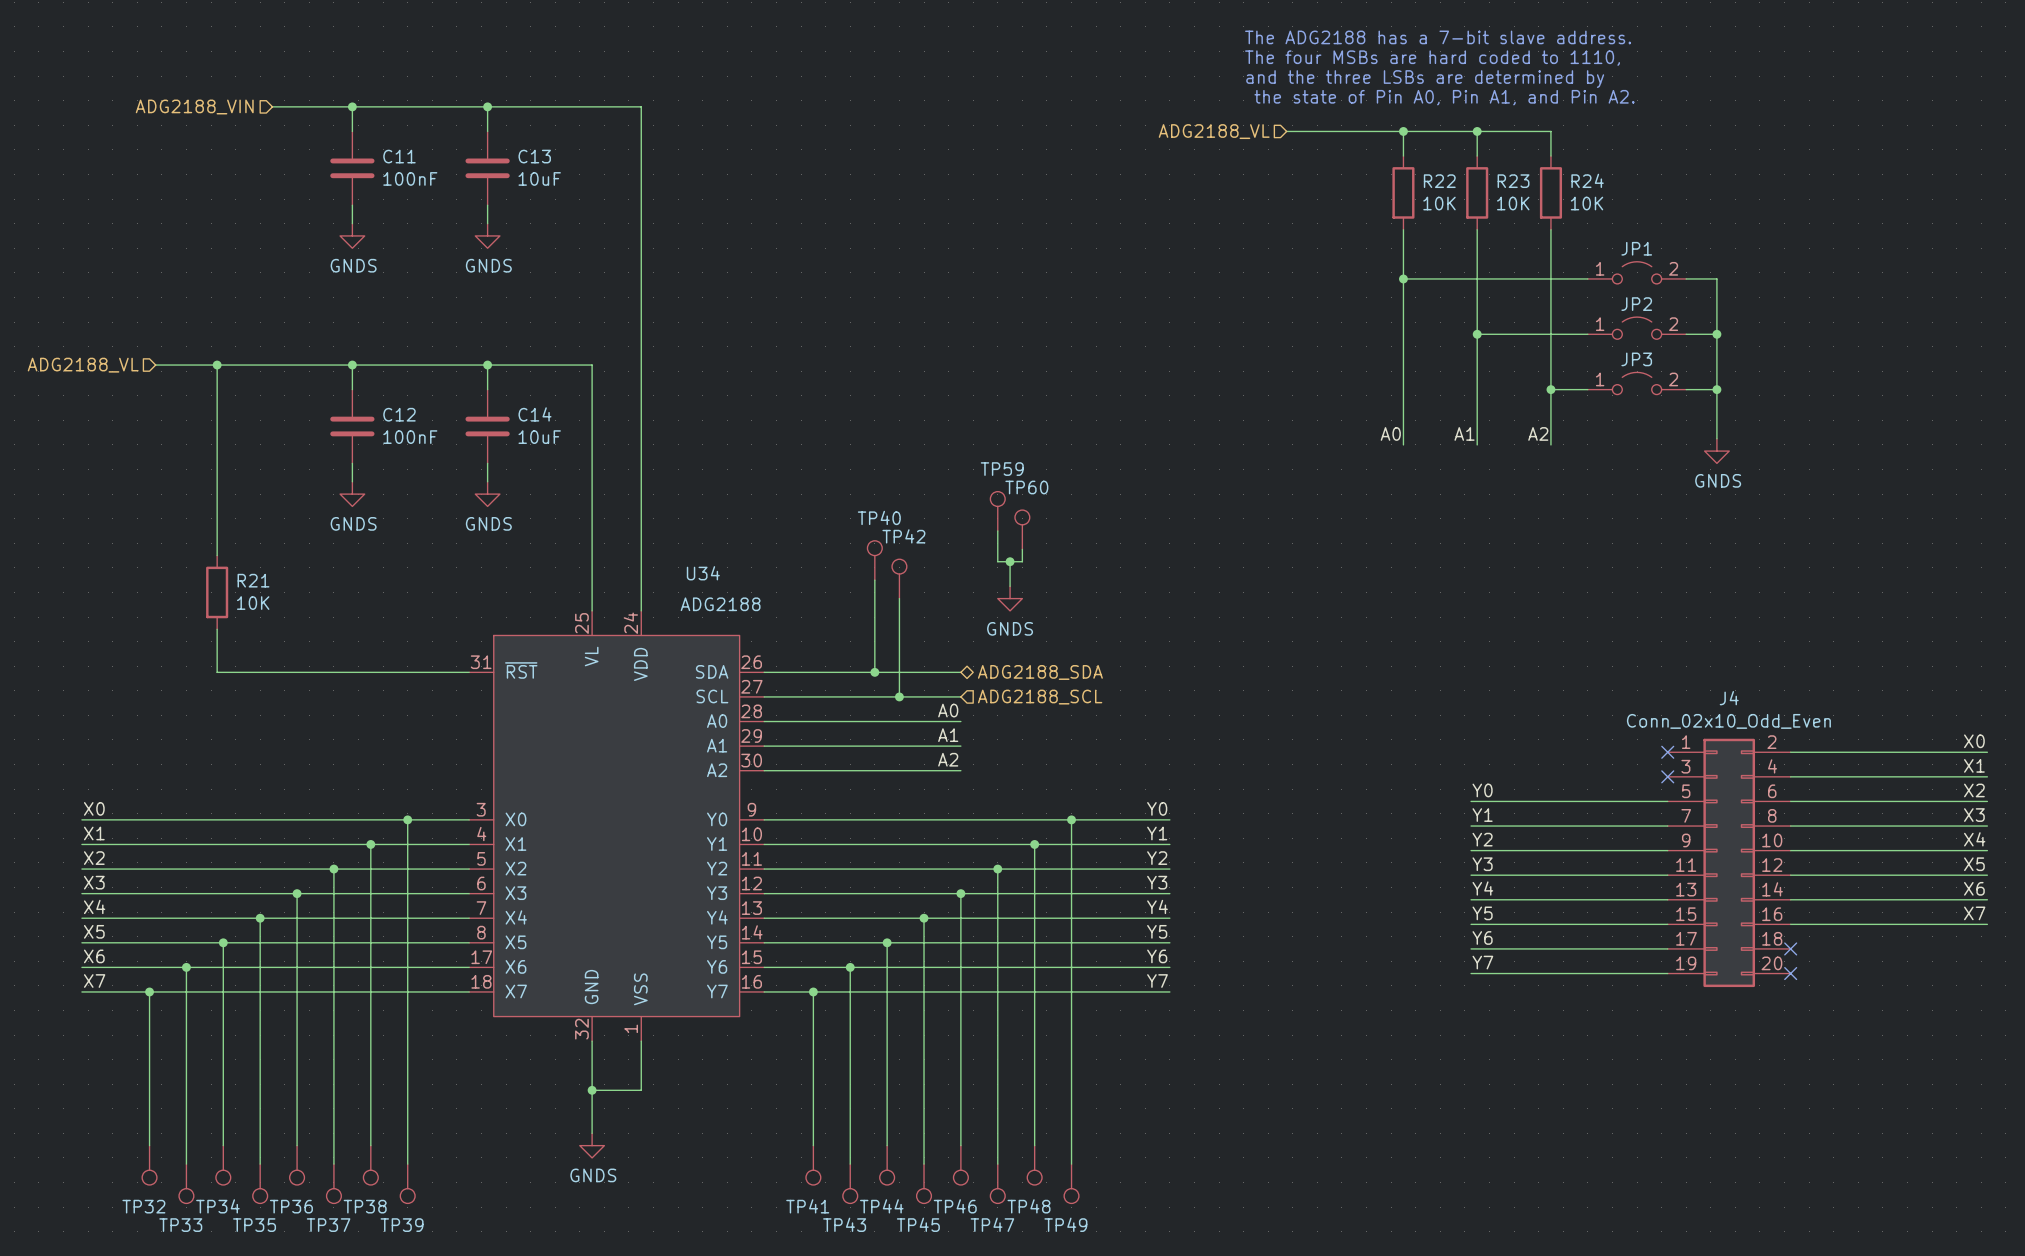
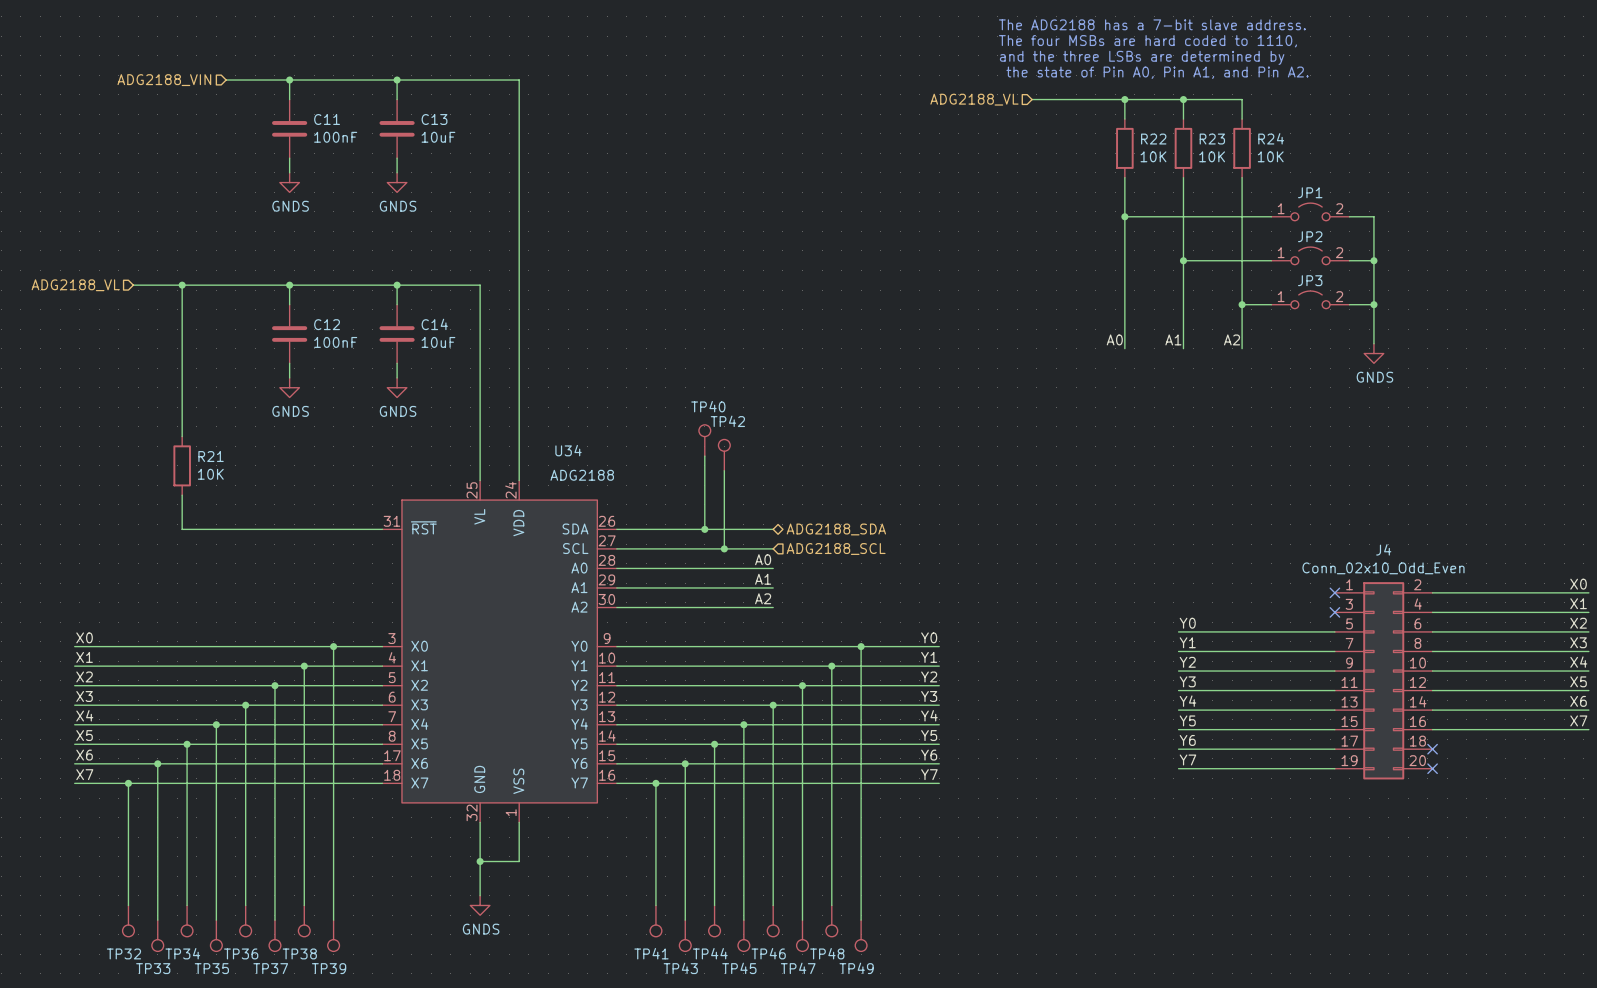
TP59: (997, 511) -> none
TP60: (1022, 529) -> none
wire: (997, 530) (997, 561) (1022, 561) (1022, 549) -> none
wire: (1010, 561) (1010, 586) -> none
junction: (1010, 561) -> none
power symbol: GNDS (1010, 598) -> none

